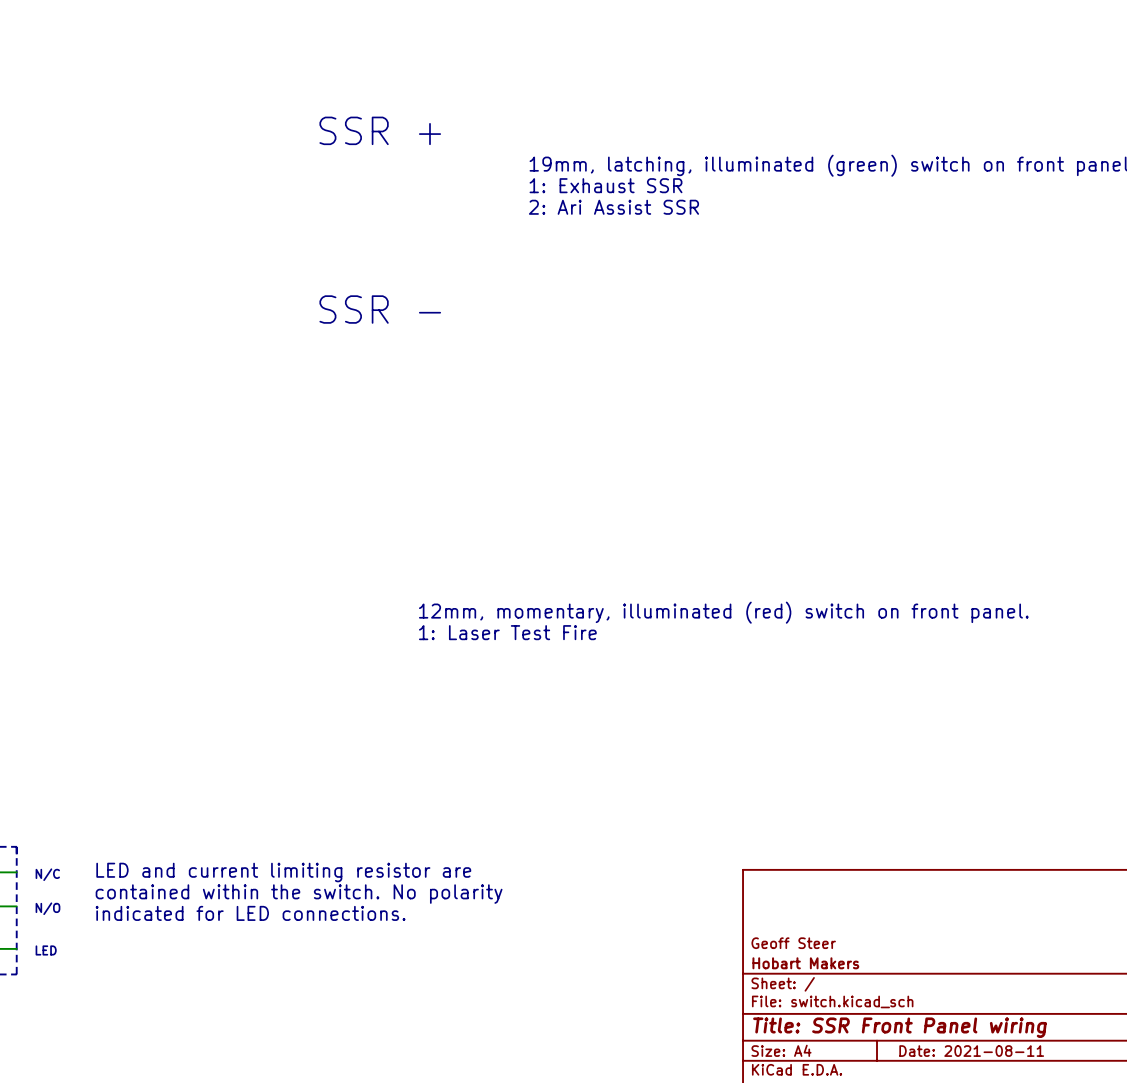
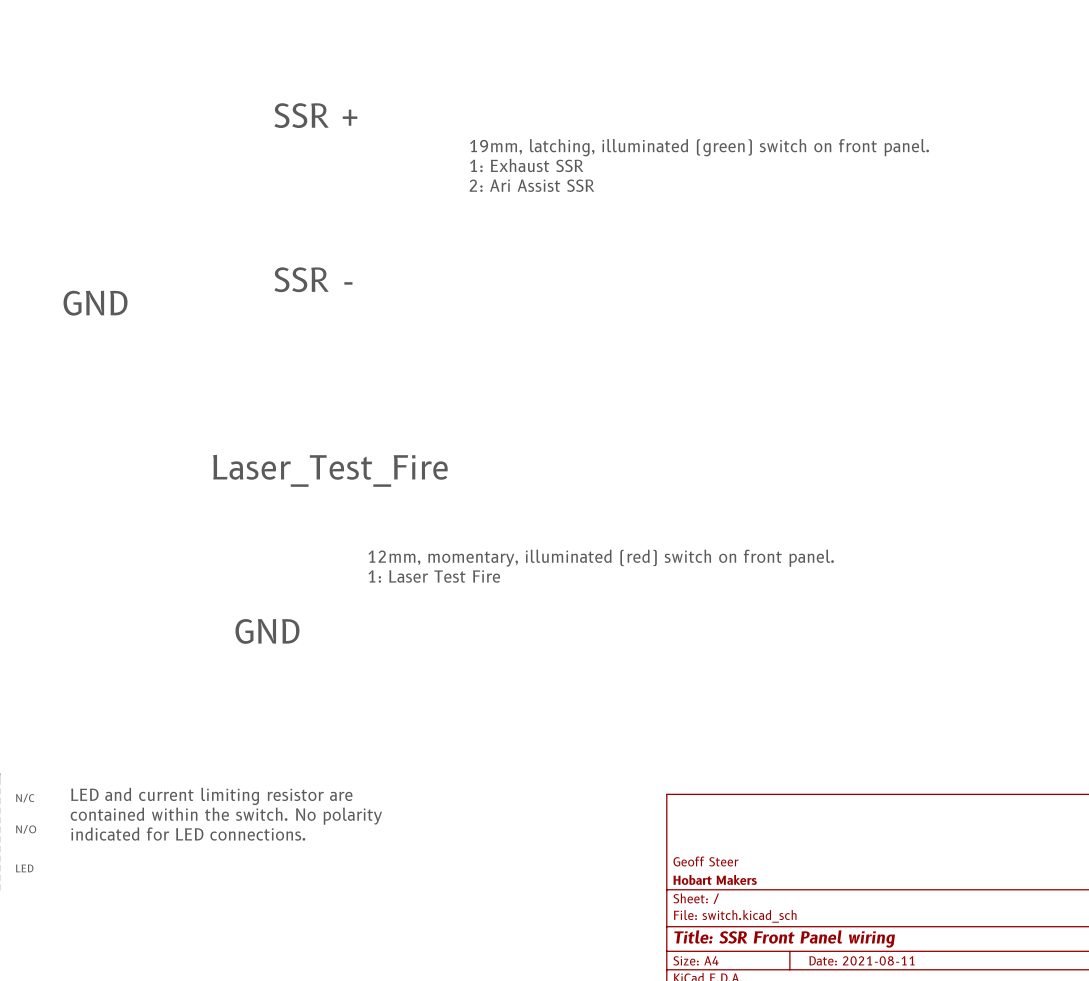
text: none -> GND (95, 303)
text: none -> Laser_Test_Fire (330, 470)
text: none -> GND (267, 631)

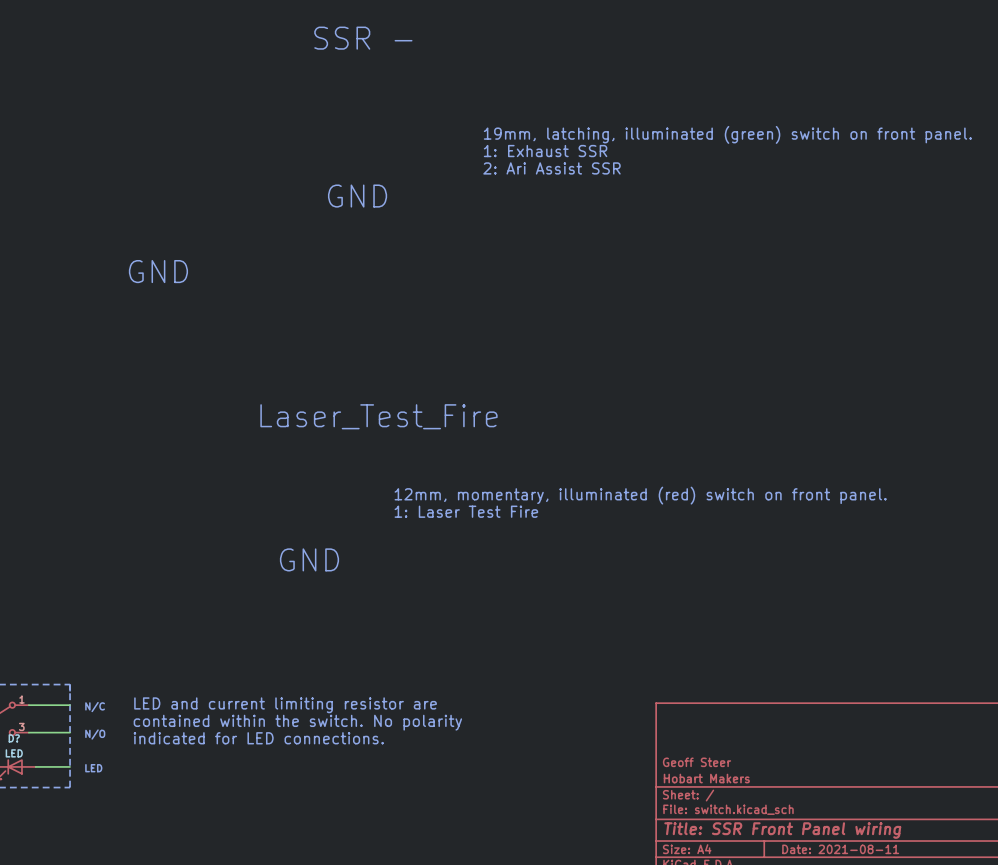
text: none -> SSR - (363, 38)
text: SSR + (315, 115) -> none
text: none -> GND (357, 196)
text: SSR - (313, 279) -> none

